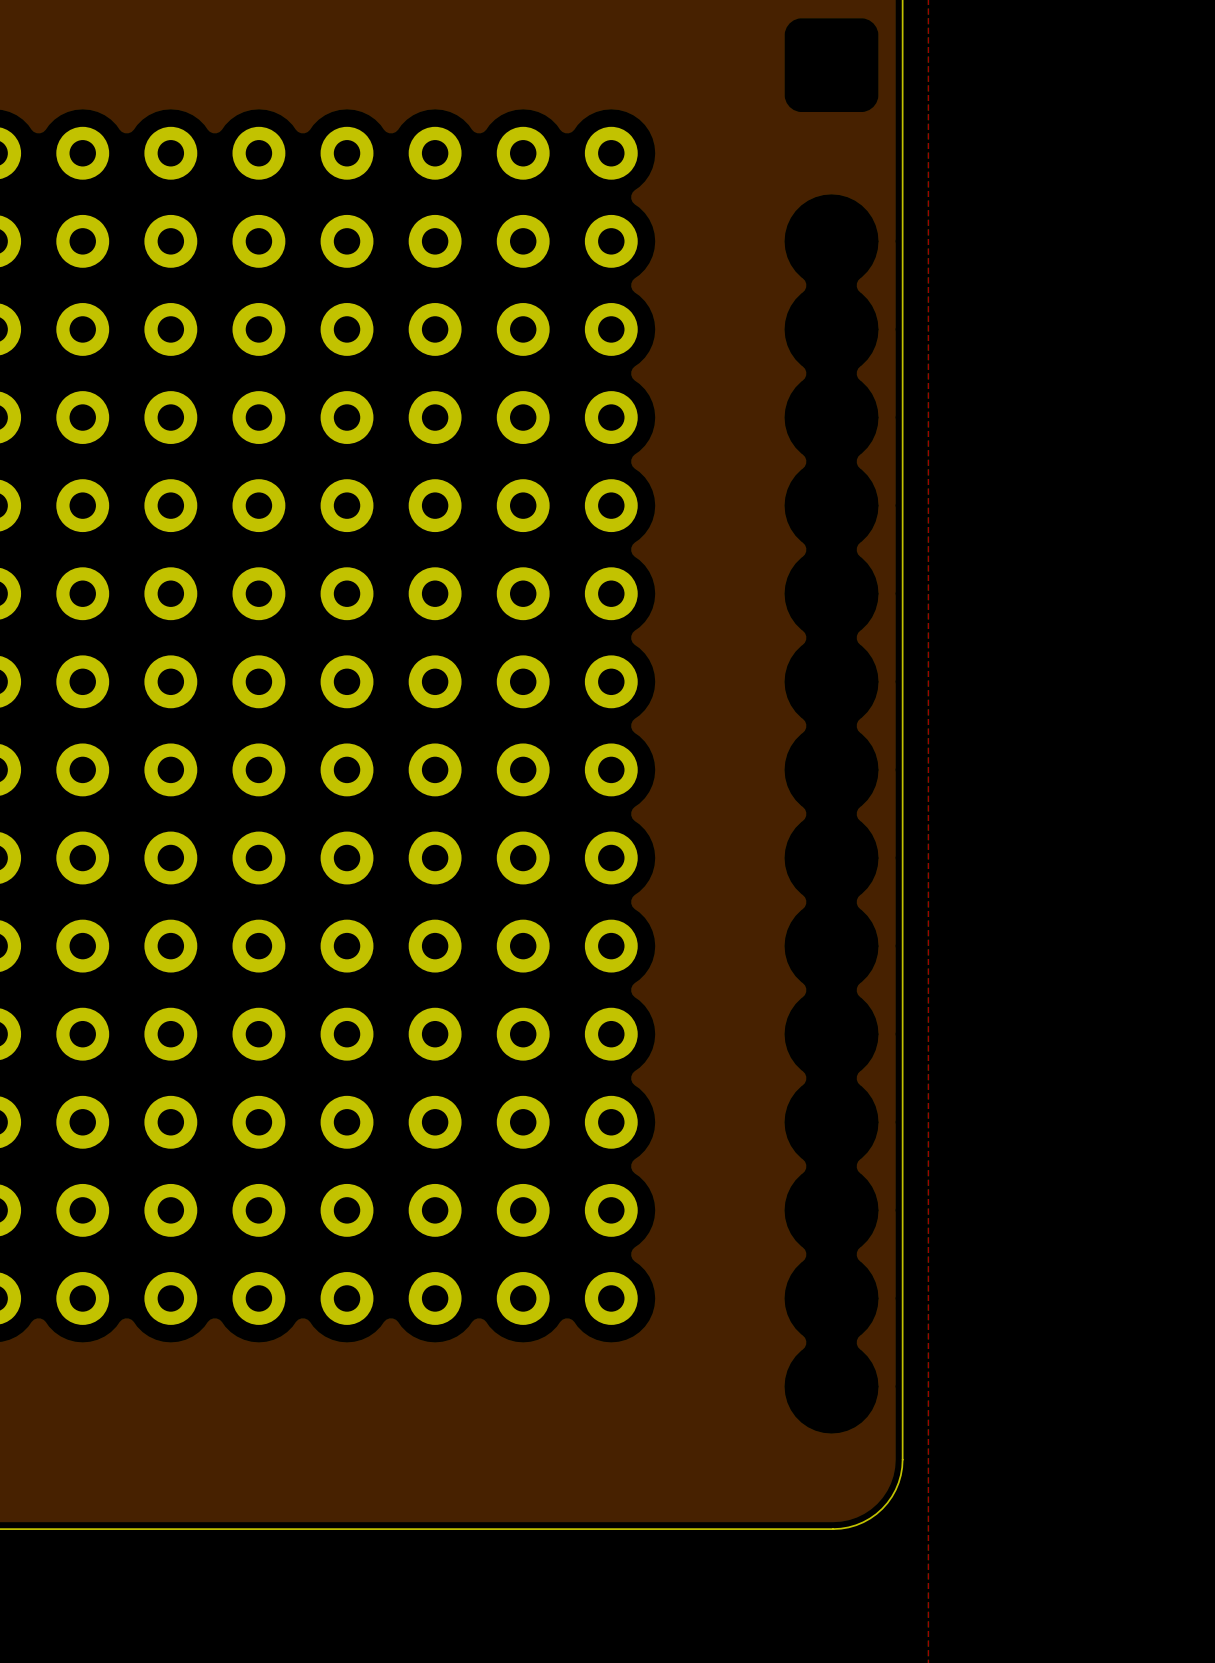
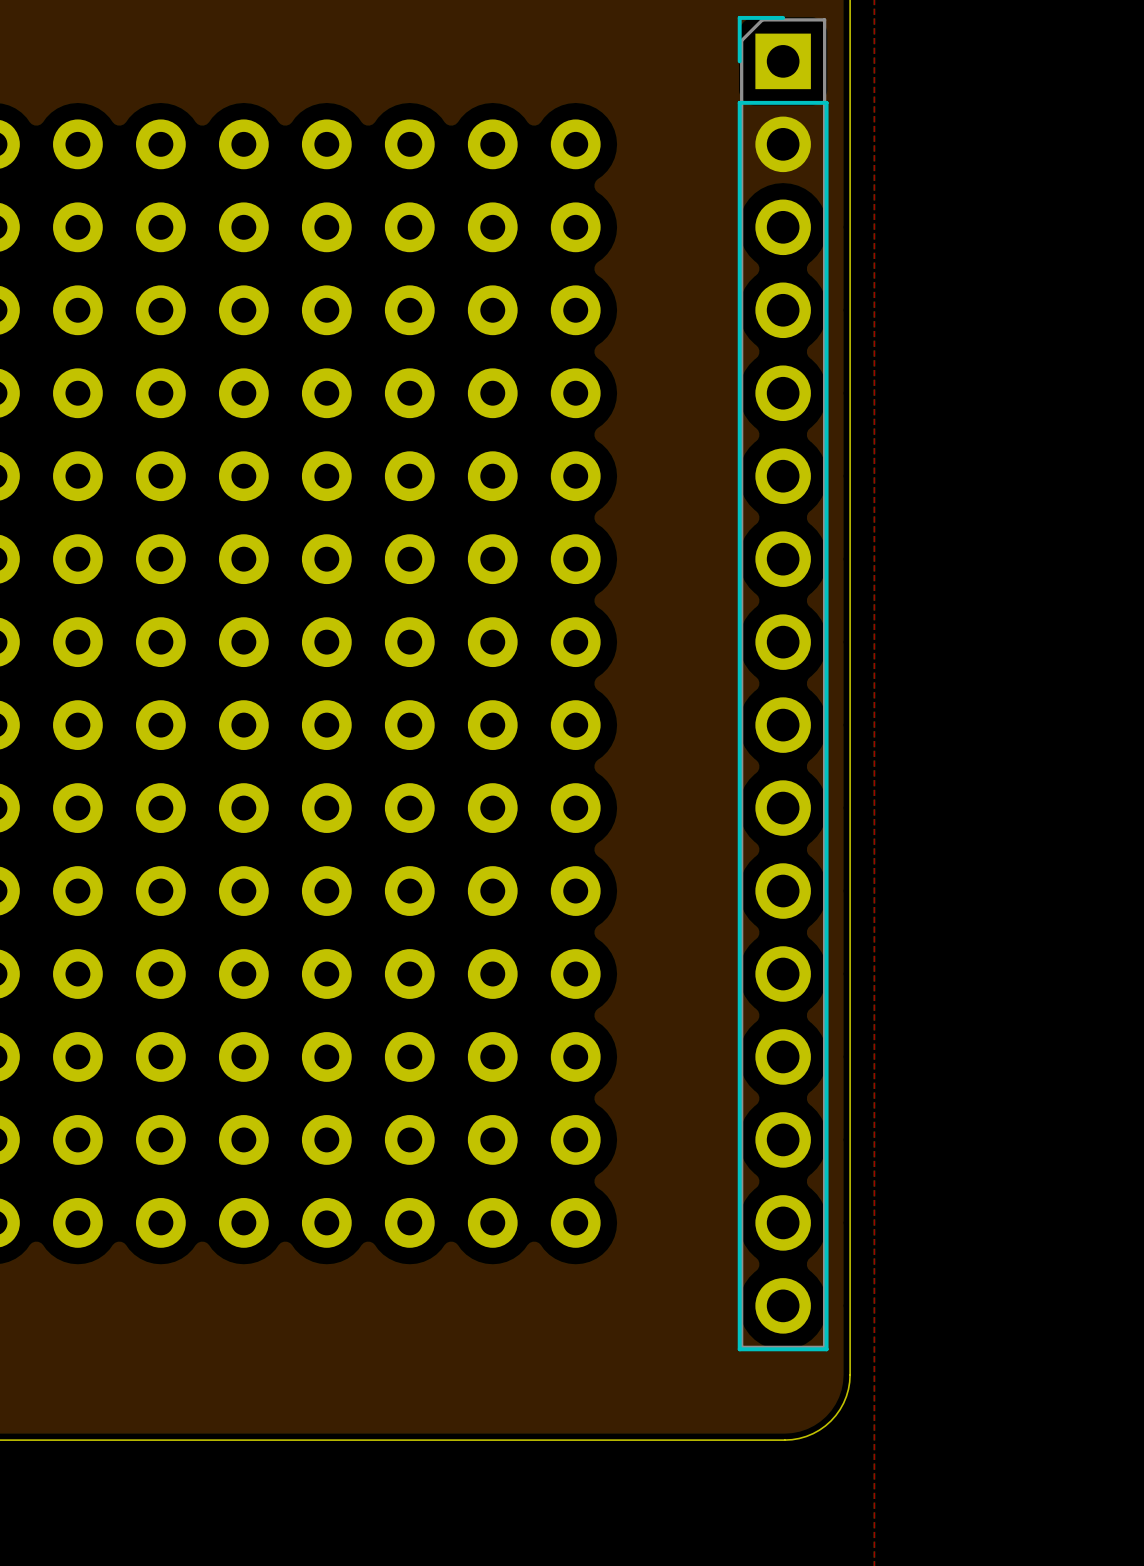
part: none -> (783, 683)

